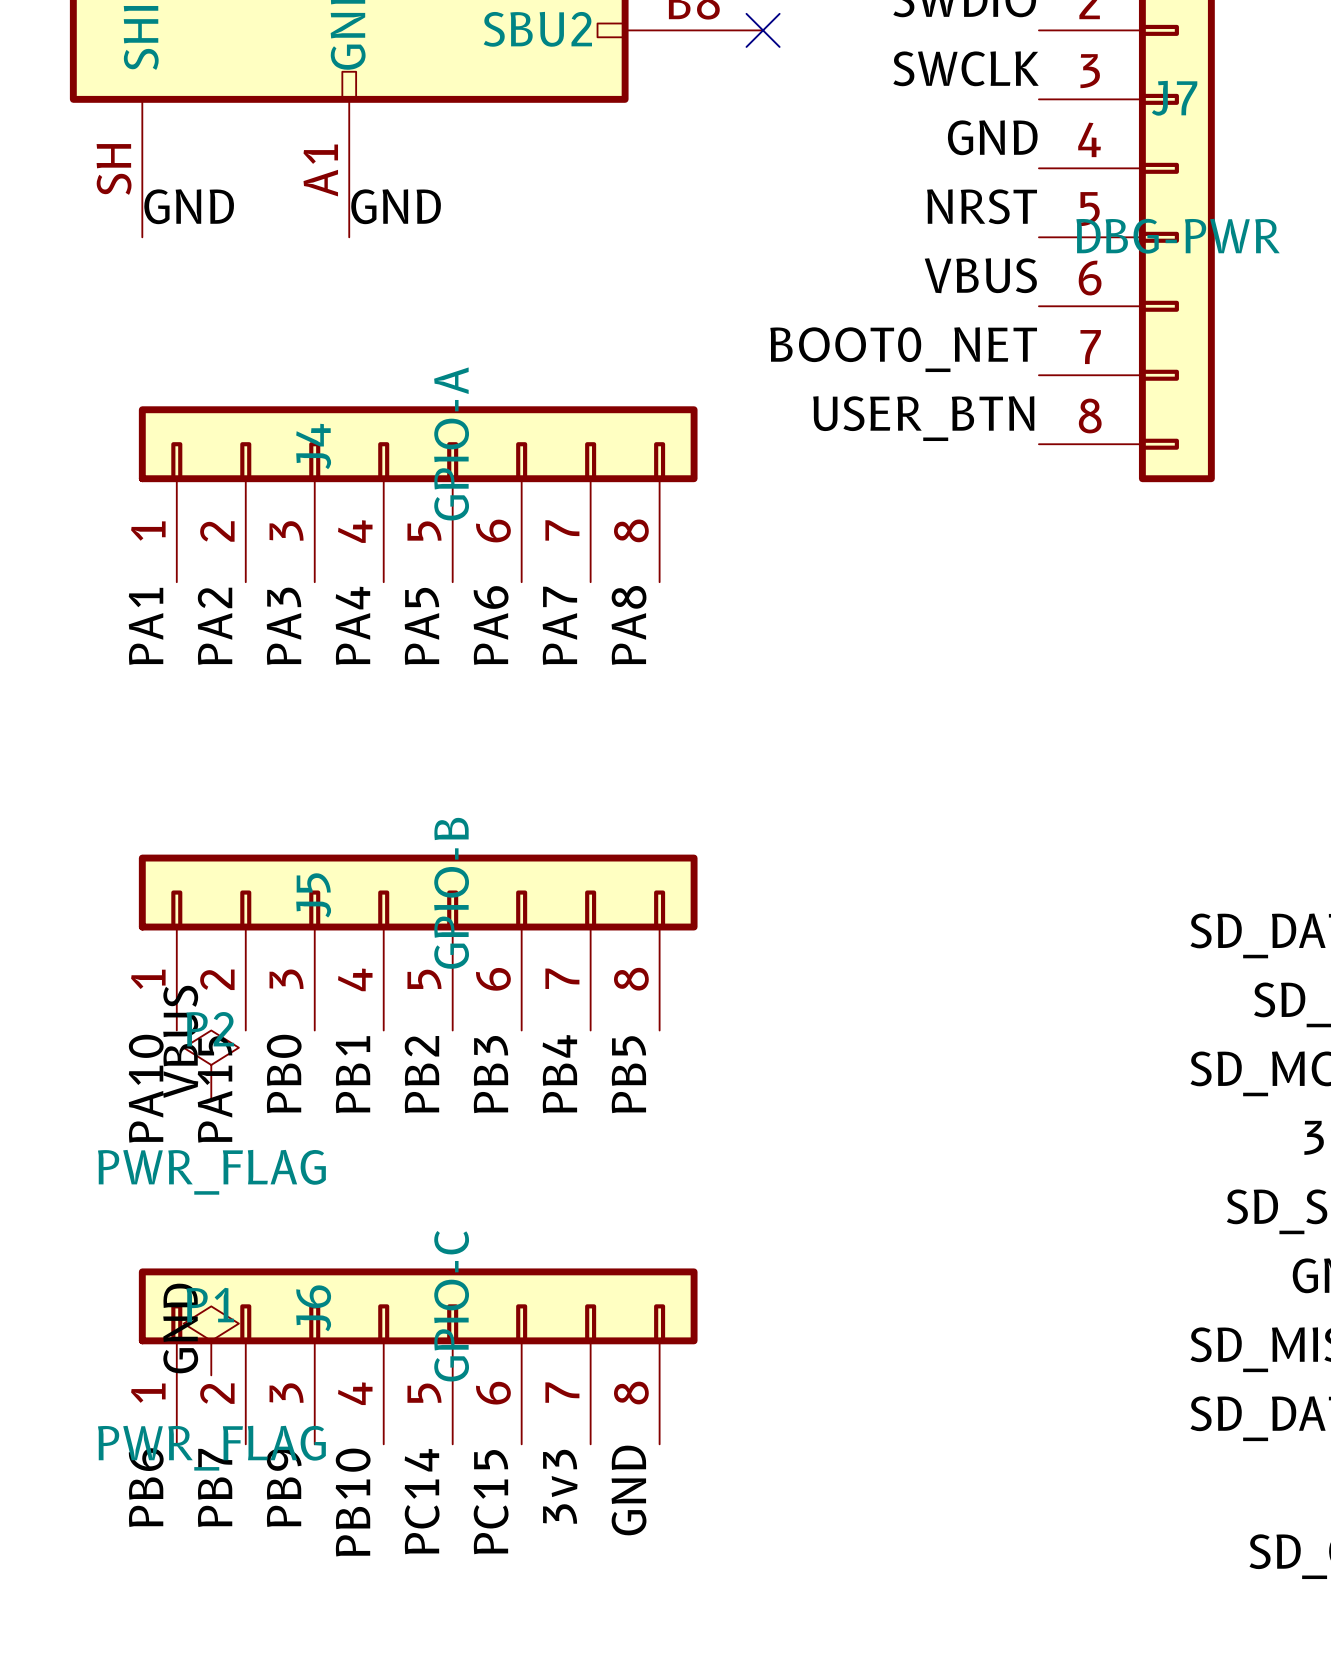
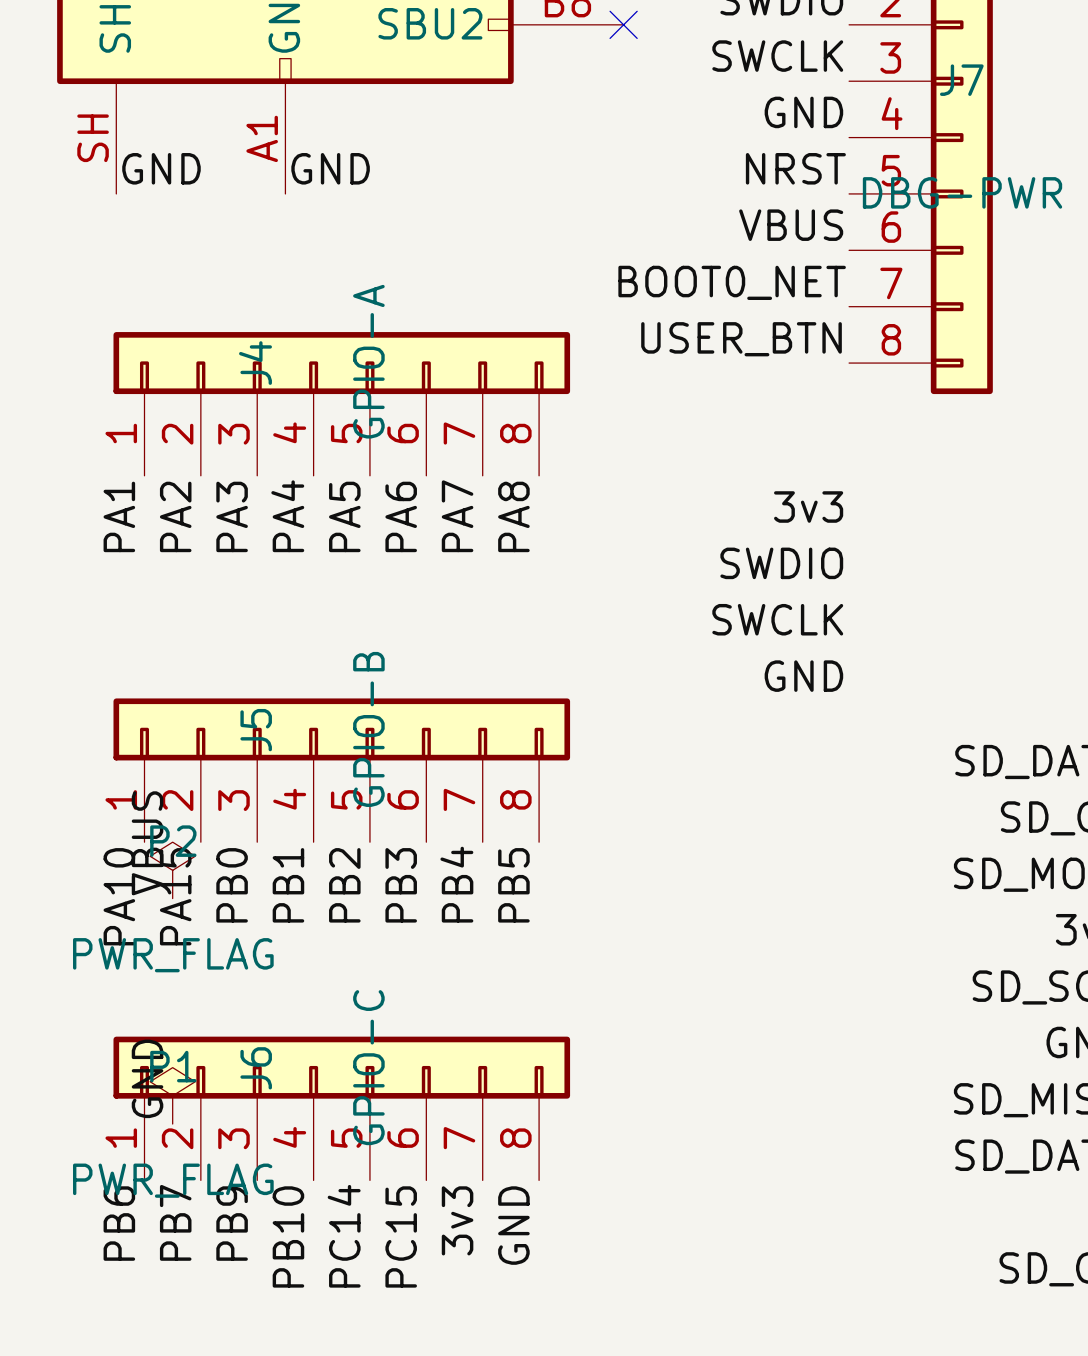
label: none -> 3v3 (808, 507)
label: none -> SWDIO (781, 563)
label: none -> SWCLK (777, 619)
label: none -> GND (803, 676)

